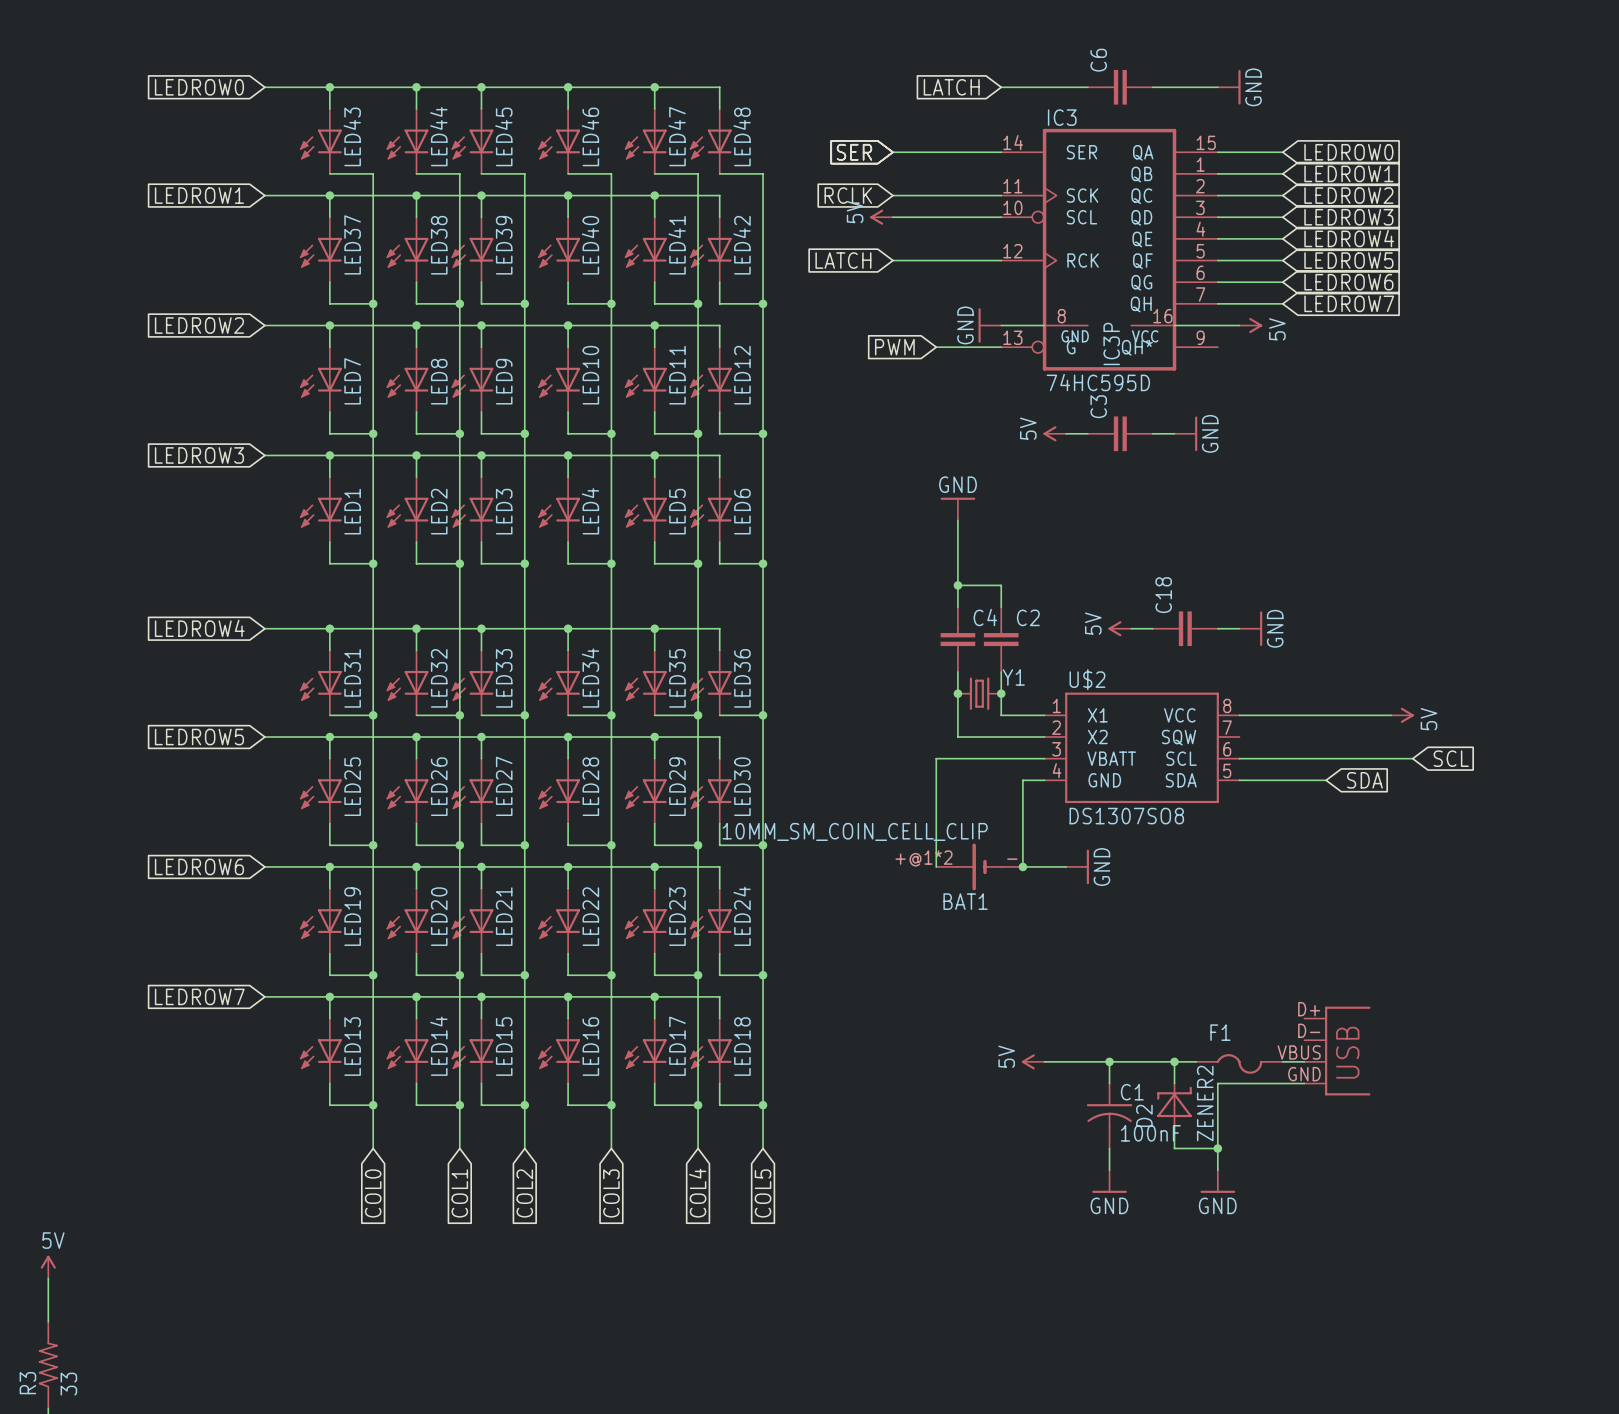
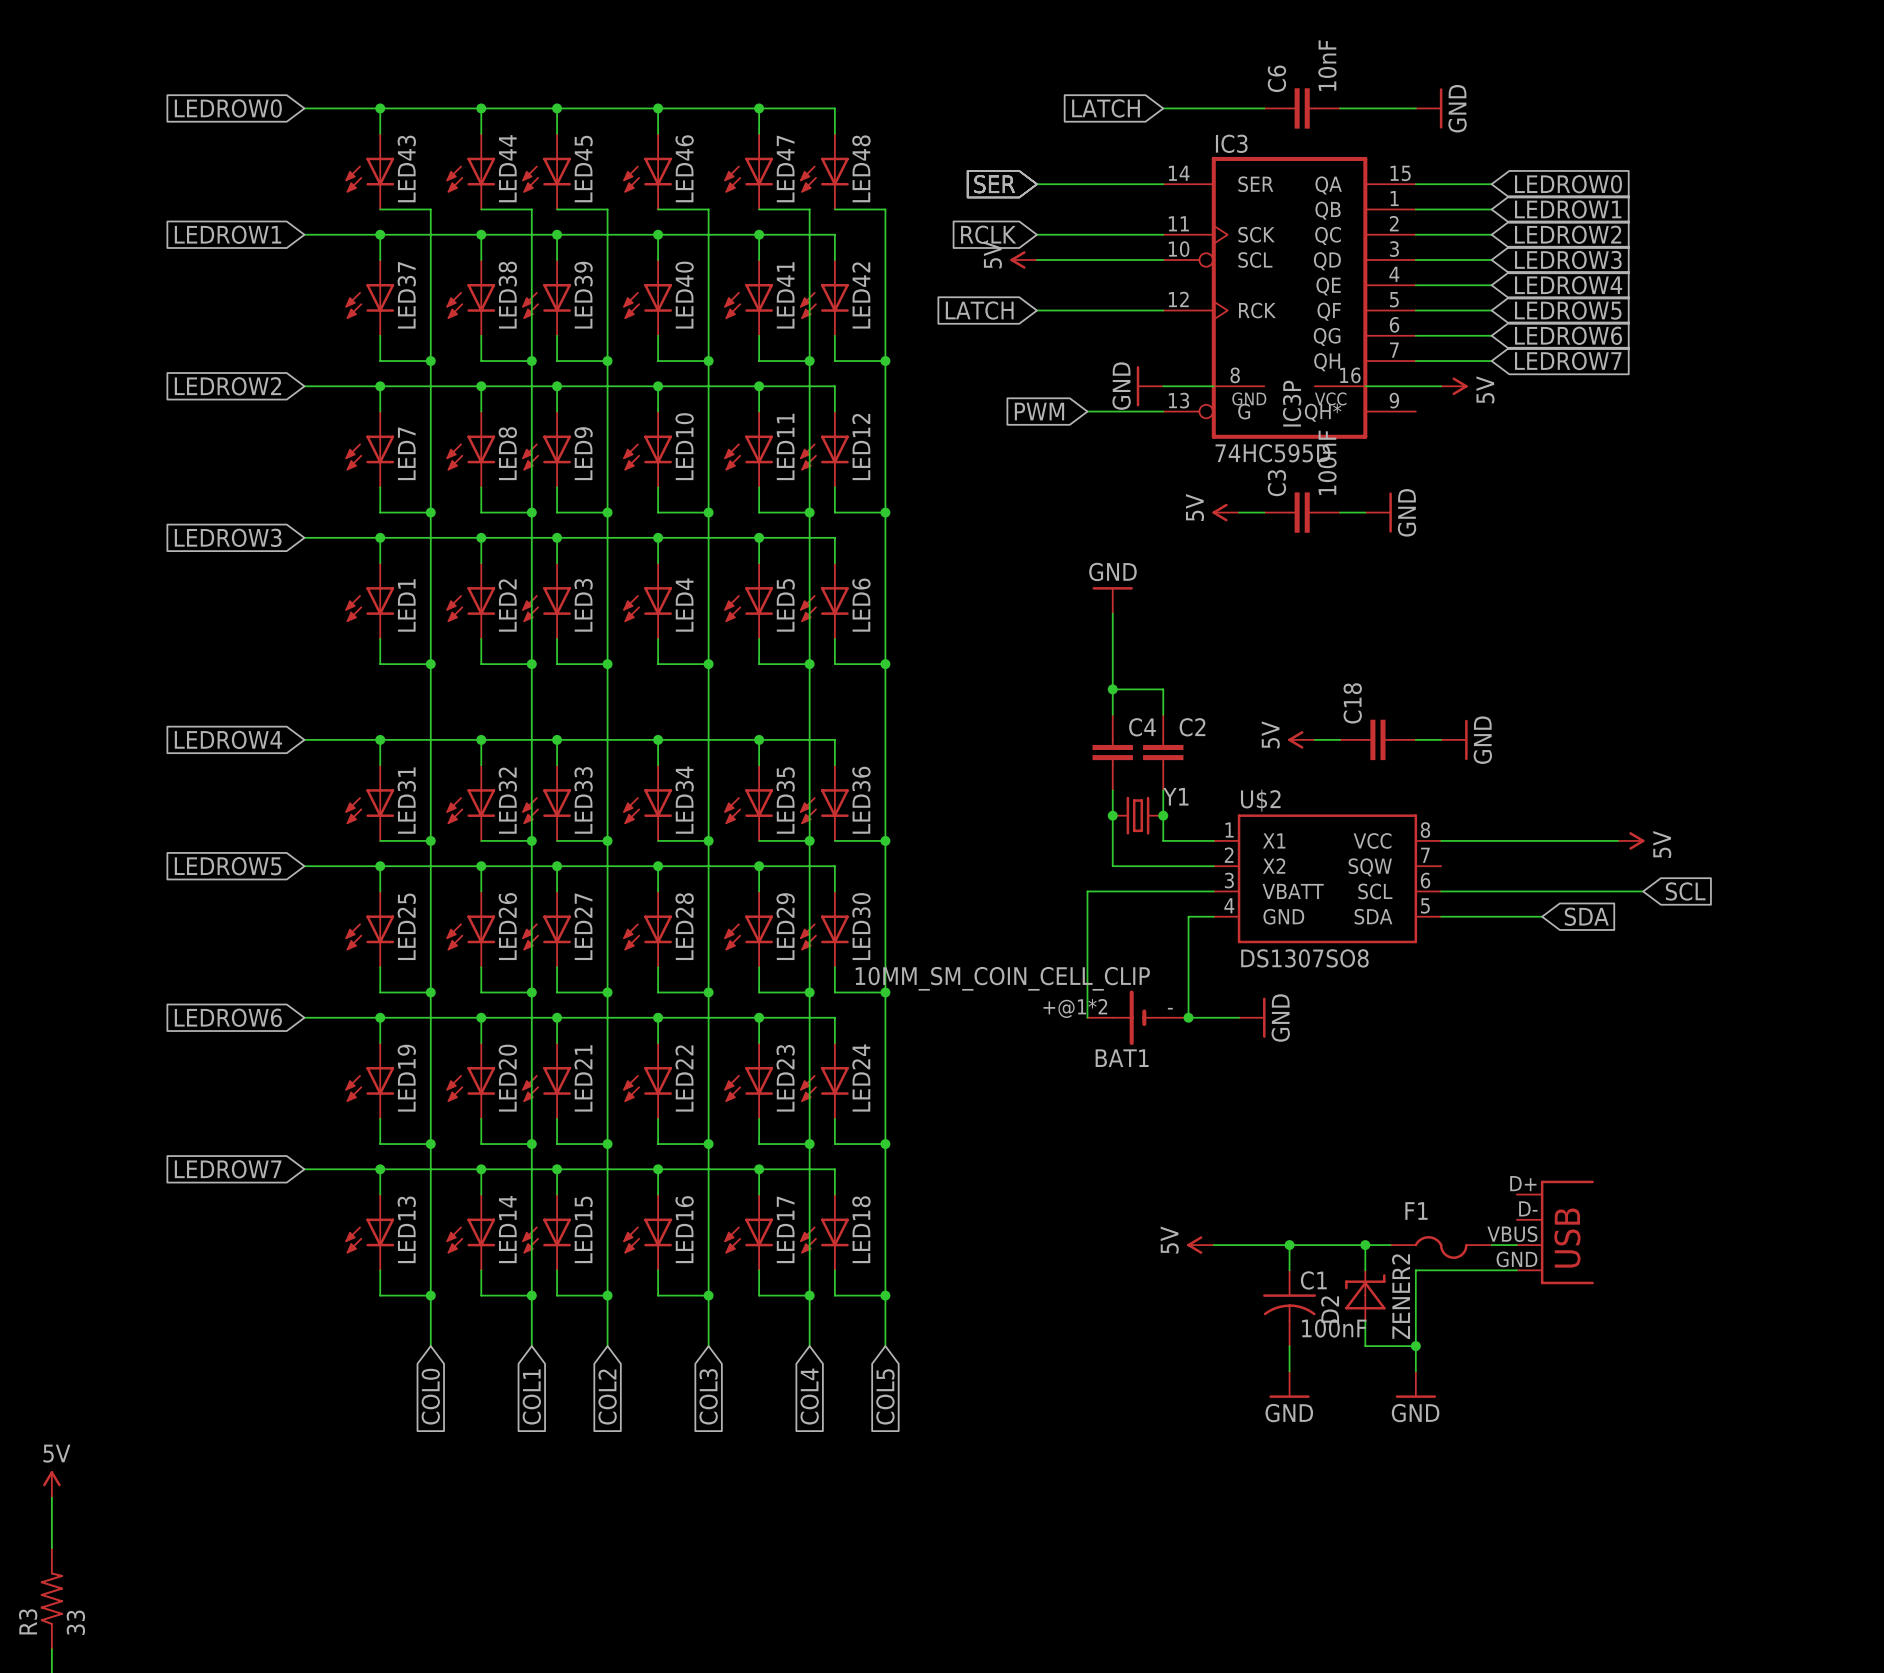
C6 value: none -> 10nF (1327, 65)
C3 value: none -> 100nF (1327, 462)

